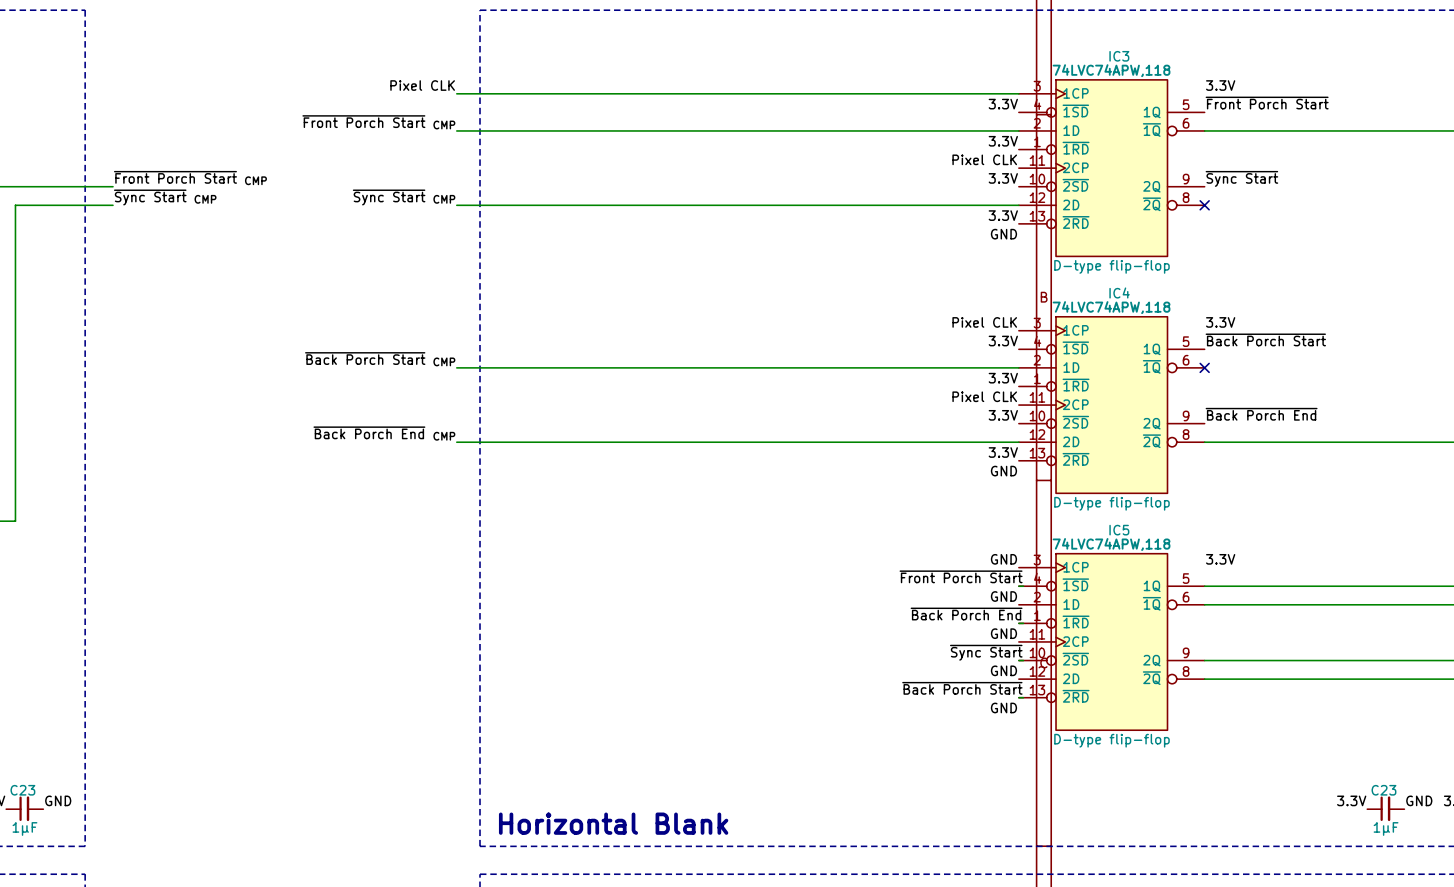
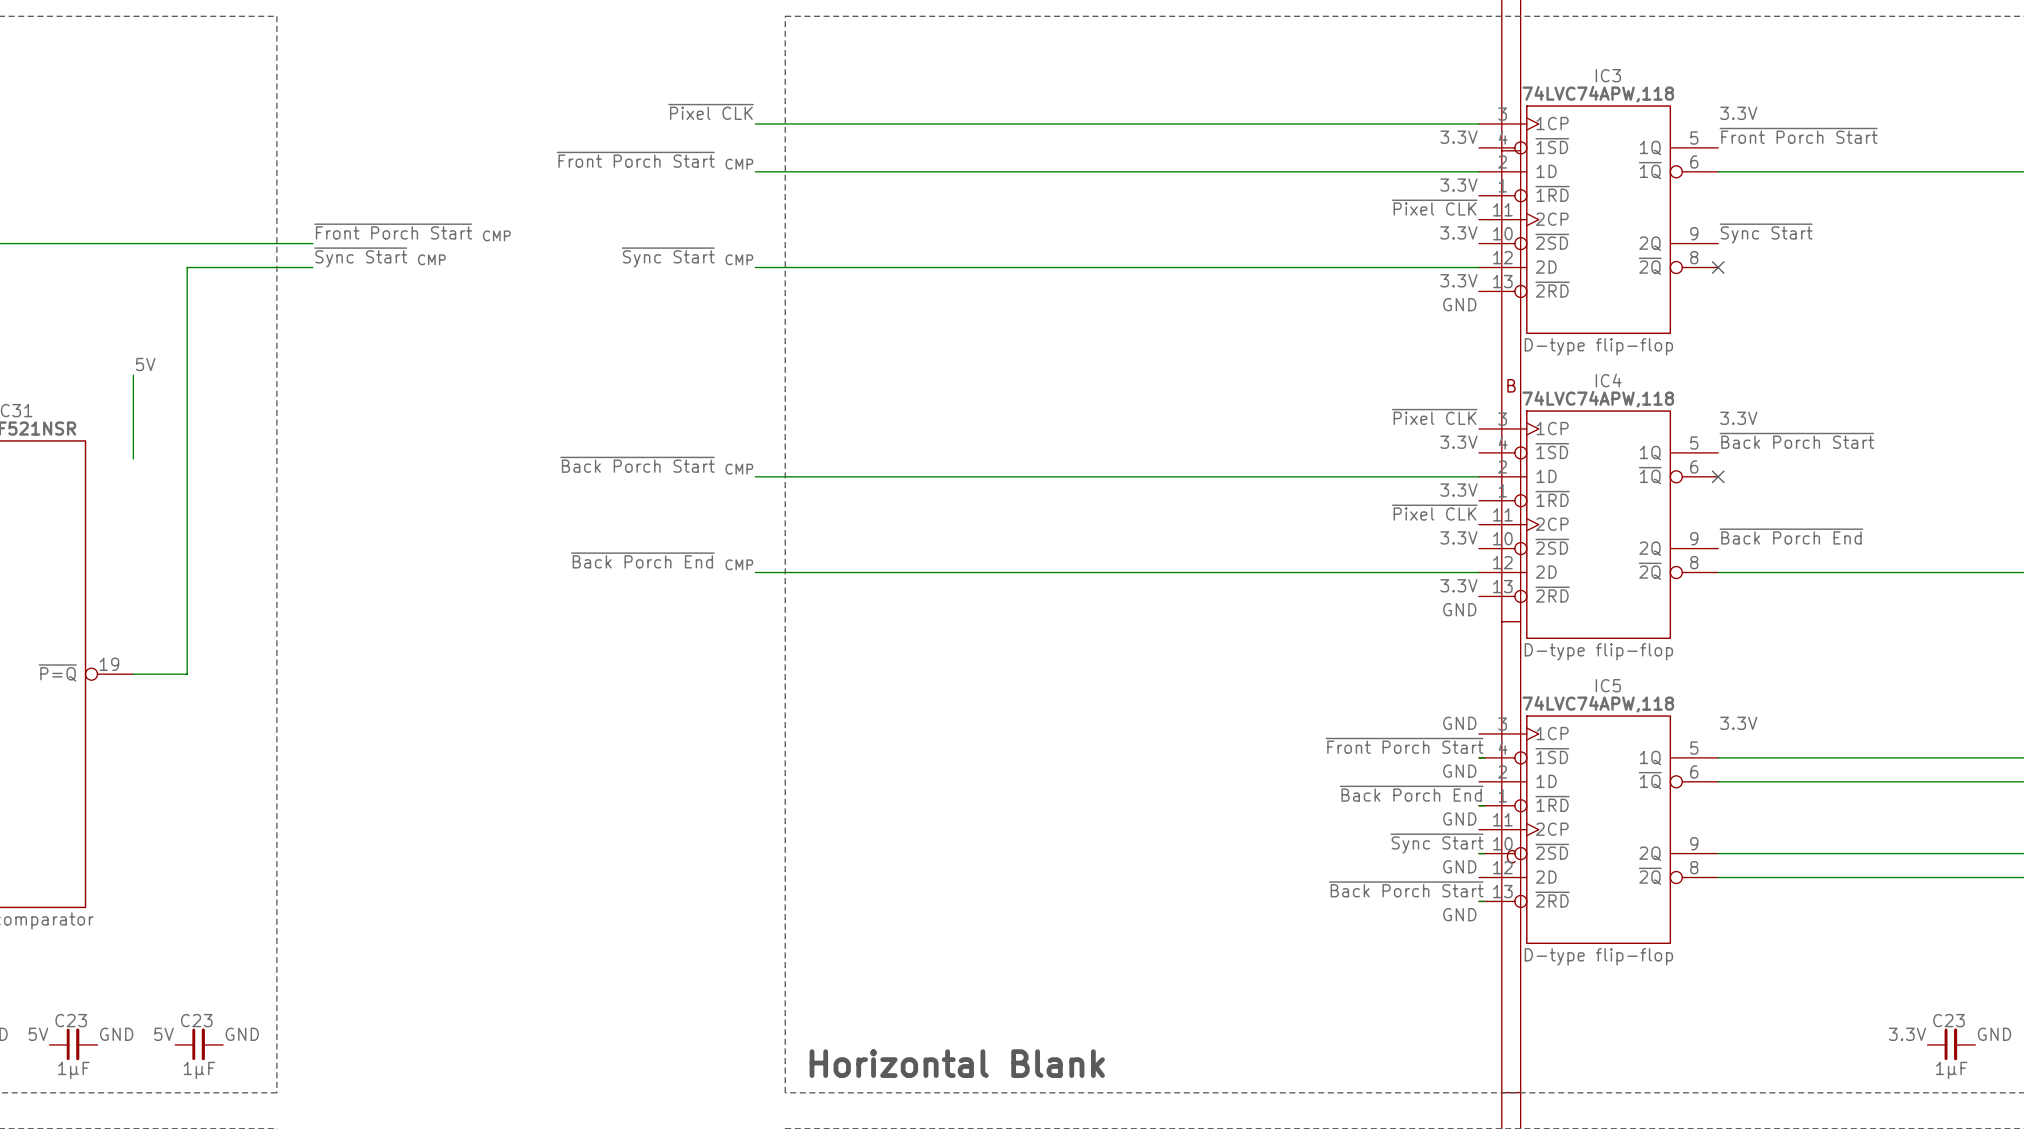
label: Pixel CLK (422, 85) -> ~{Pixel CLK} (711, 111)
label: Pixel CLK (984, 159) -> ~{Pixel CLK} (1434, 207)
label: Pixel CLK (984, 322) -> ~{Pixel CLK} (1434, 416)
label: Pixel CLK (984, 396) -> ~{Pixel CLK} (1434, 512)

